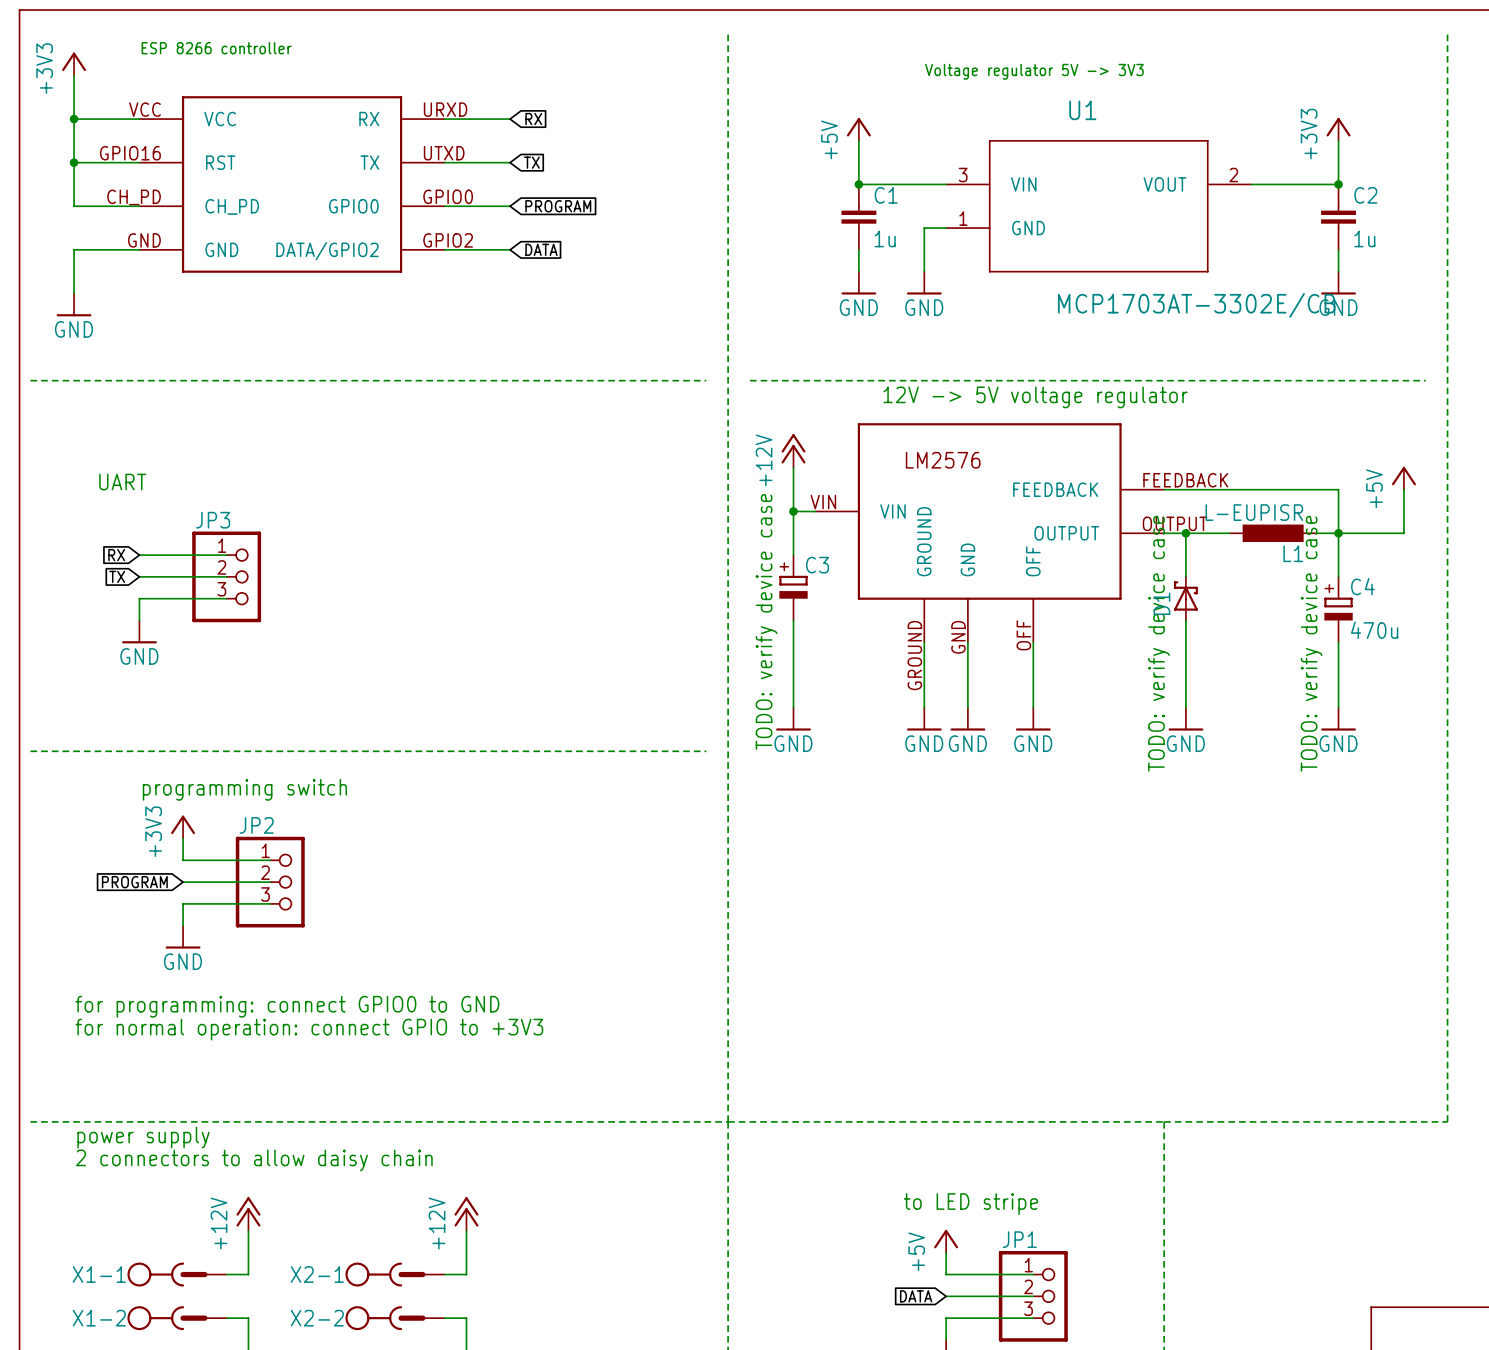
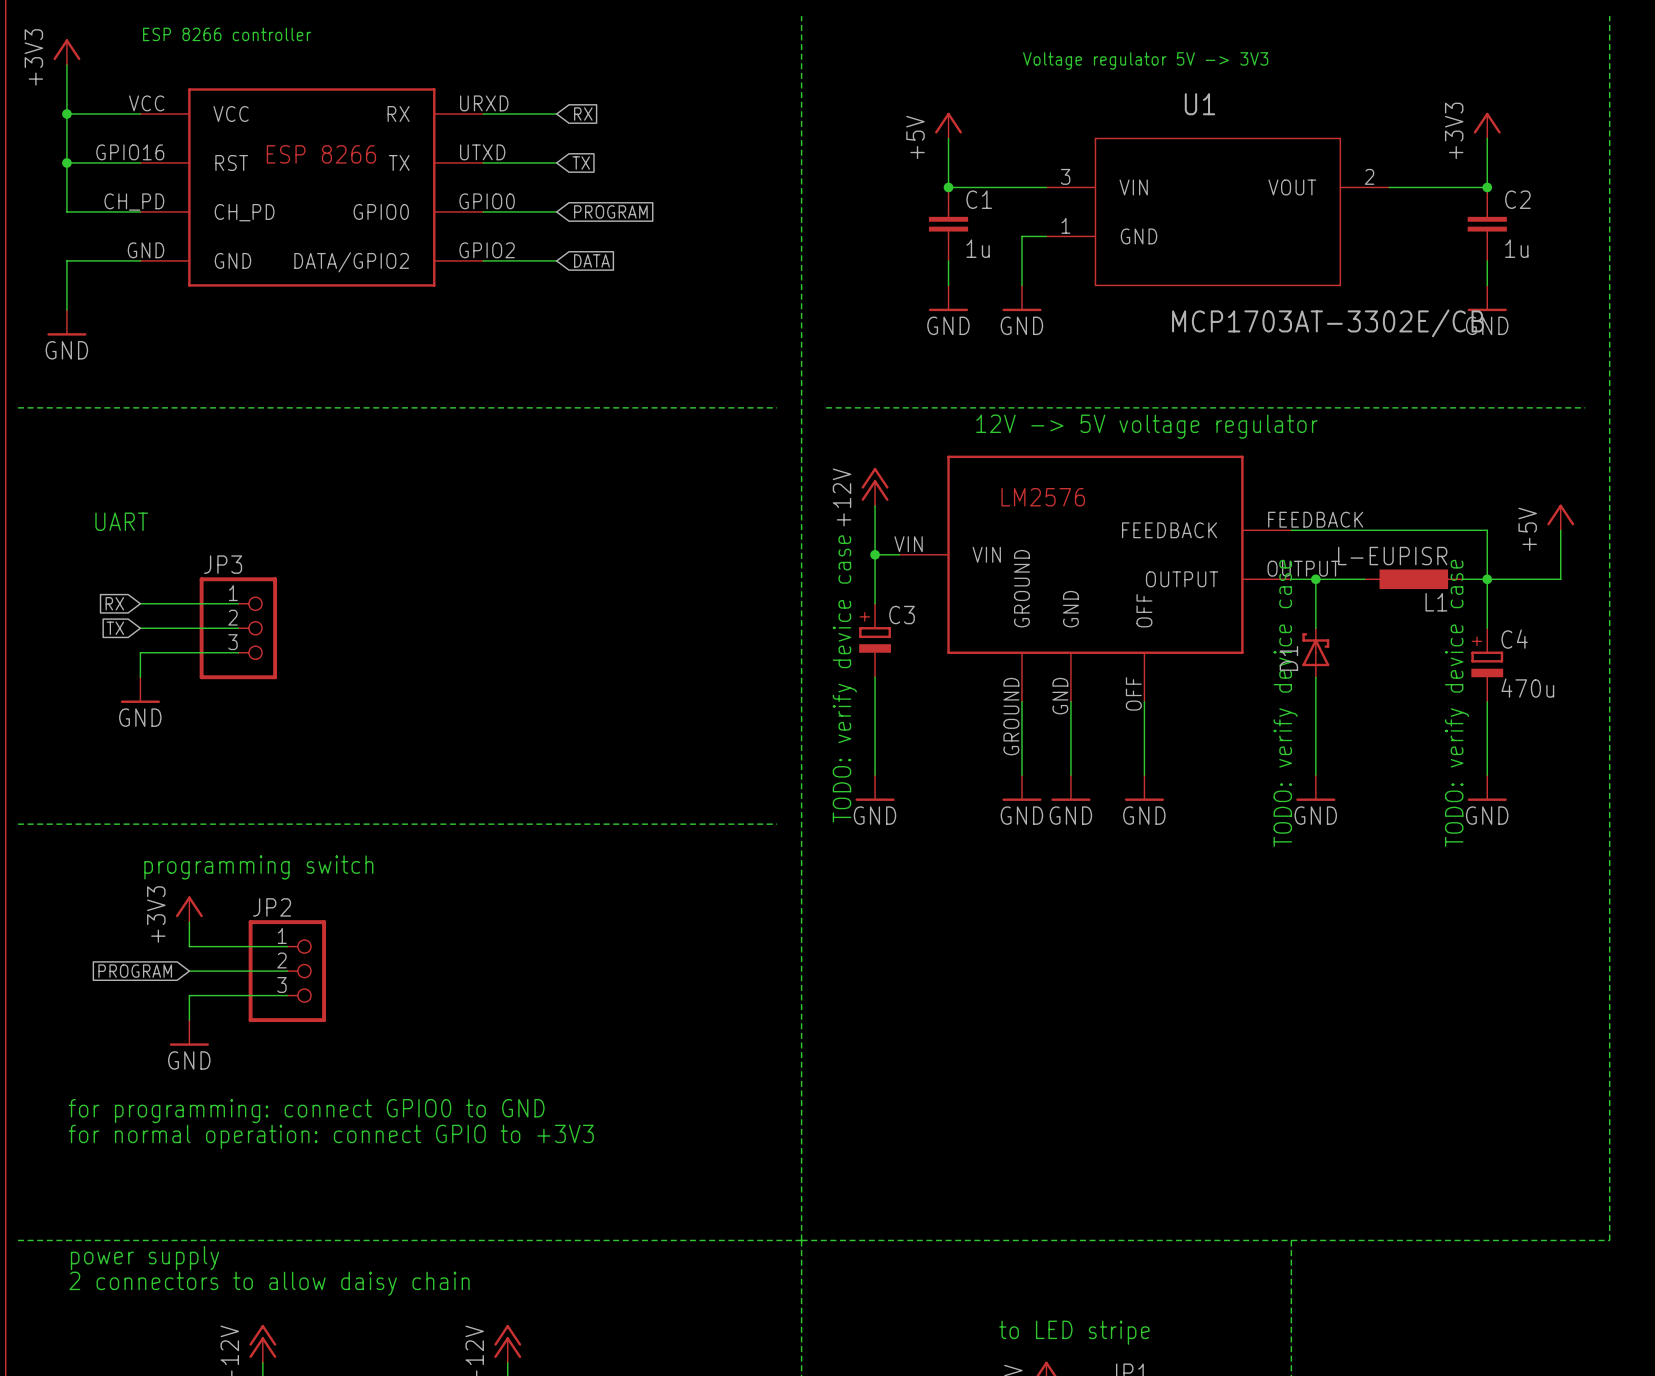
part text: none -> ESP 8266 (321, 154)

